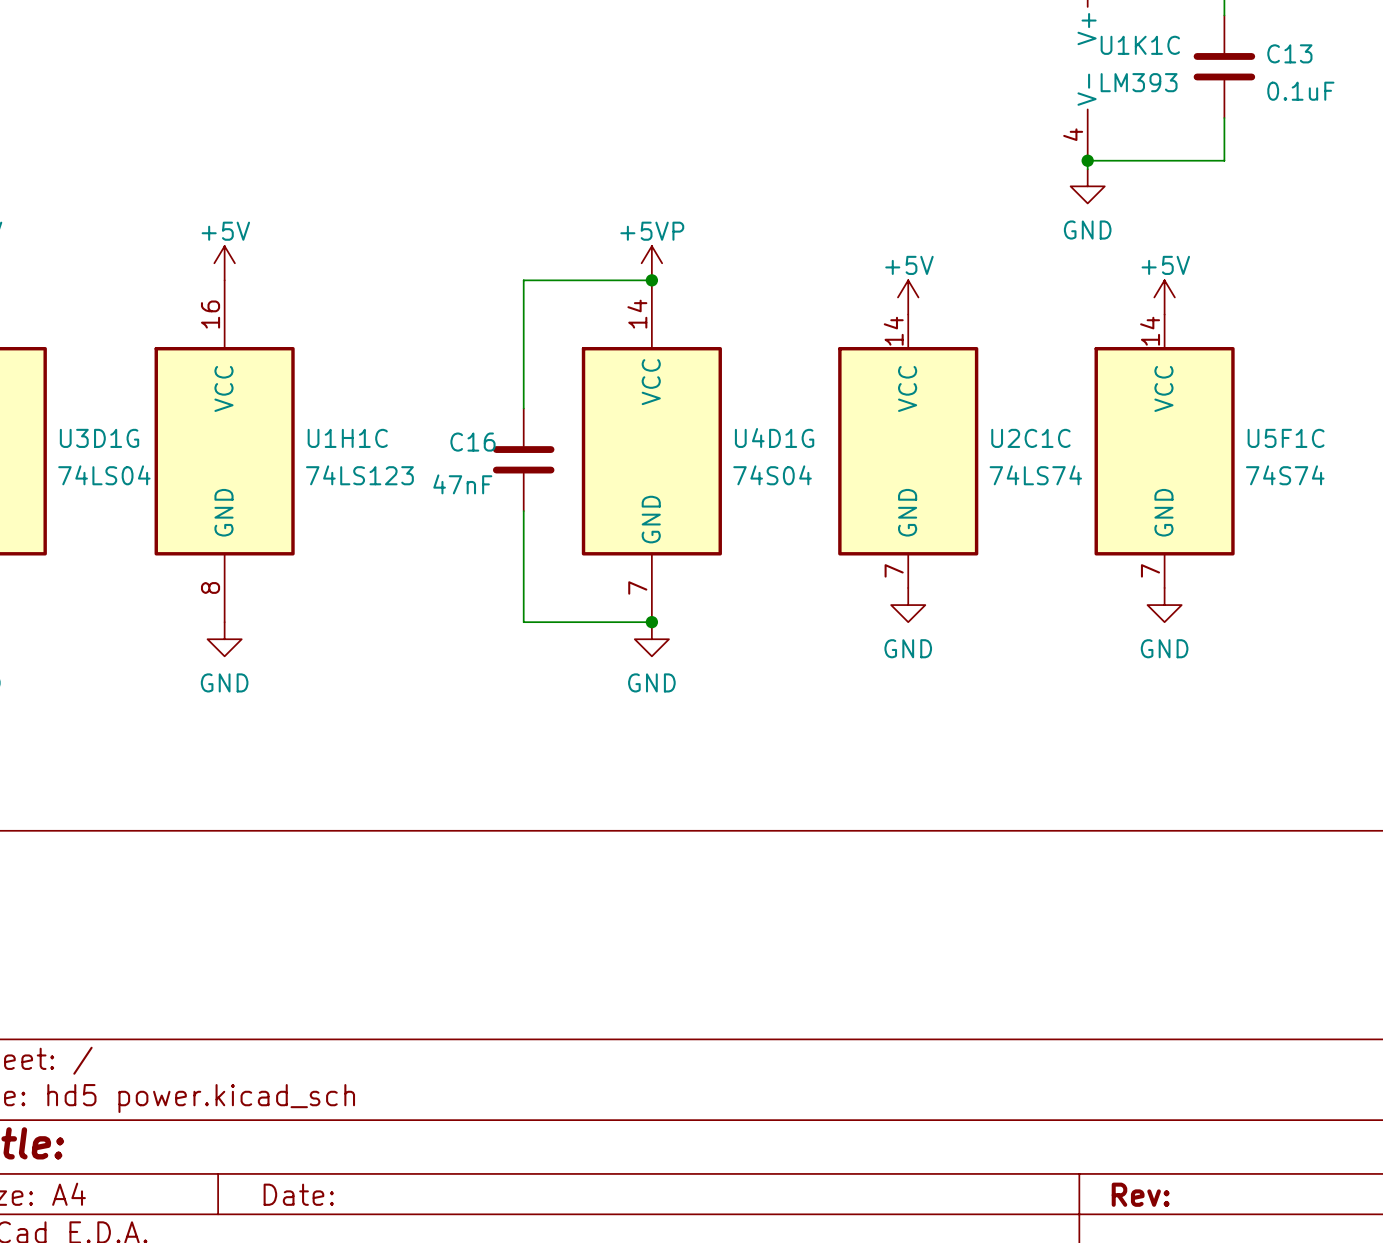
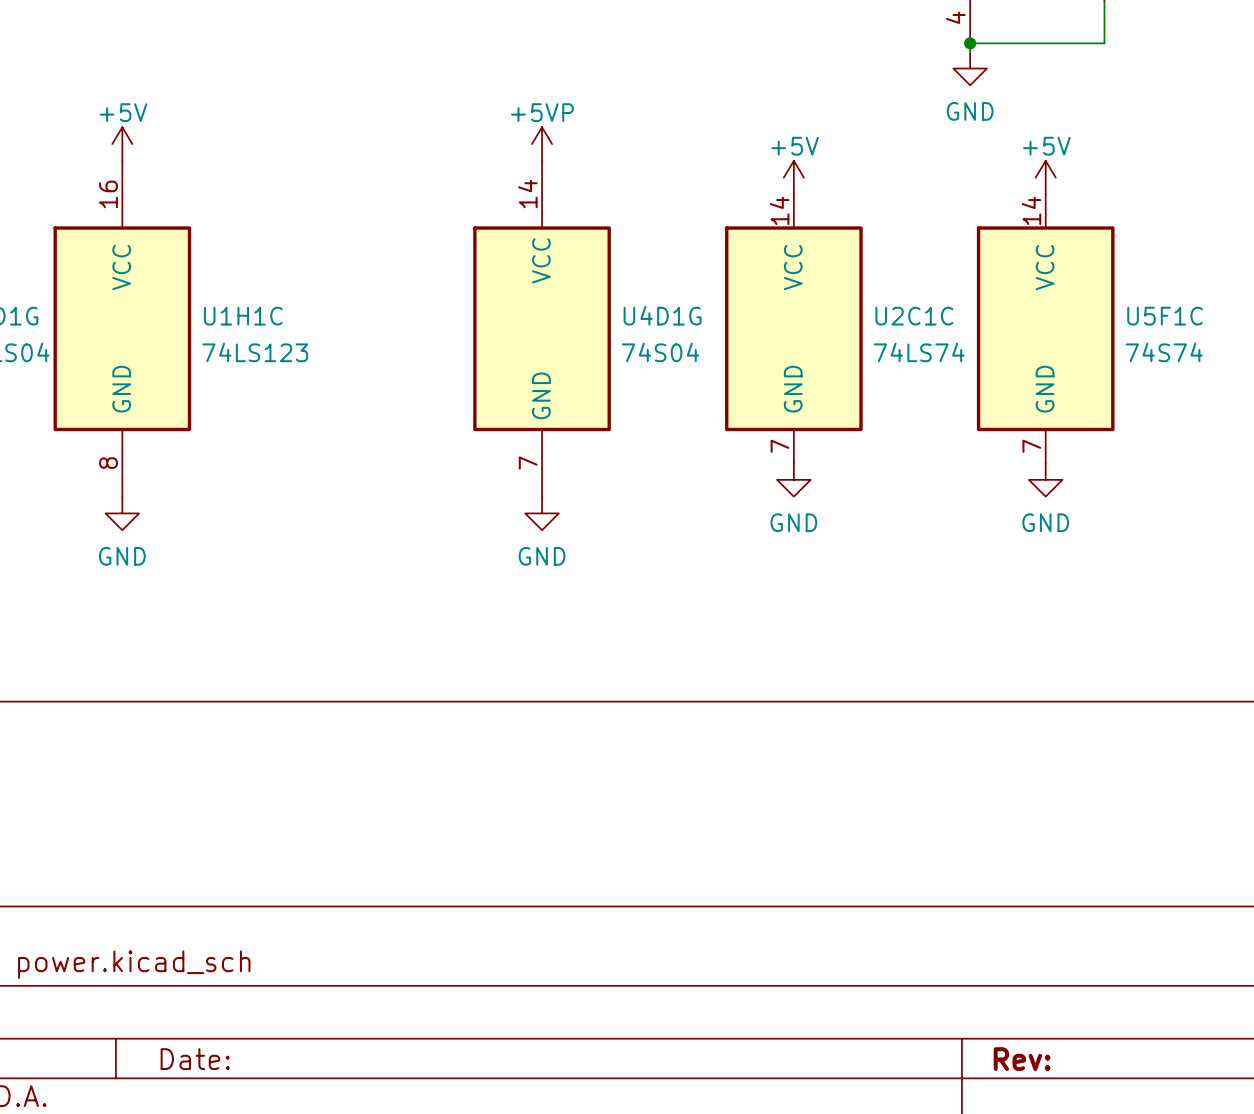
wire: (651, 280) (523, 280) (523, 408) -> none
junction: (651, 280) -> none
C16: 47nF (523, 459) -> none
wire: (523, 511) (523, 622) (651, 622) -> none
junction: (651, 622) -> none

